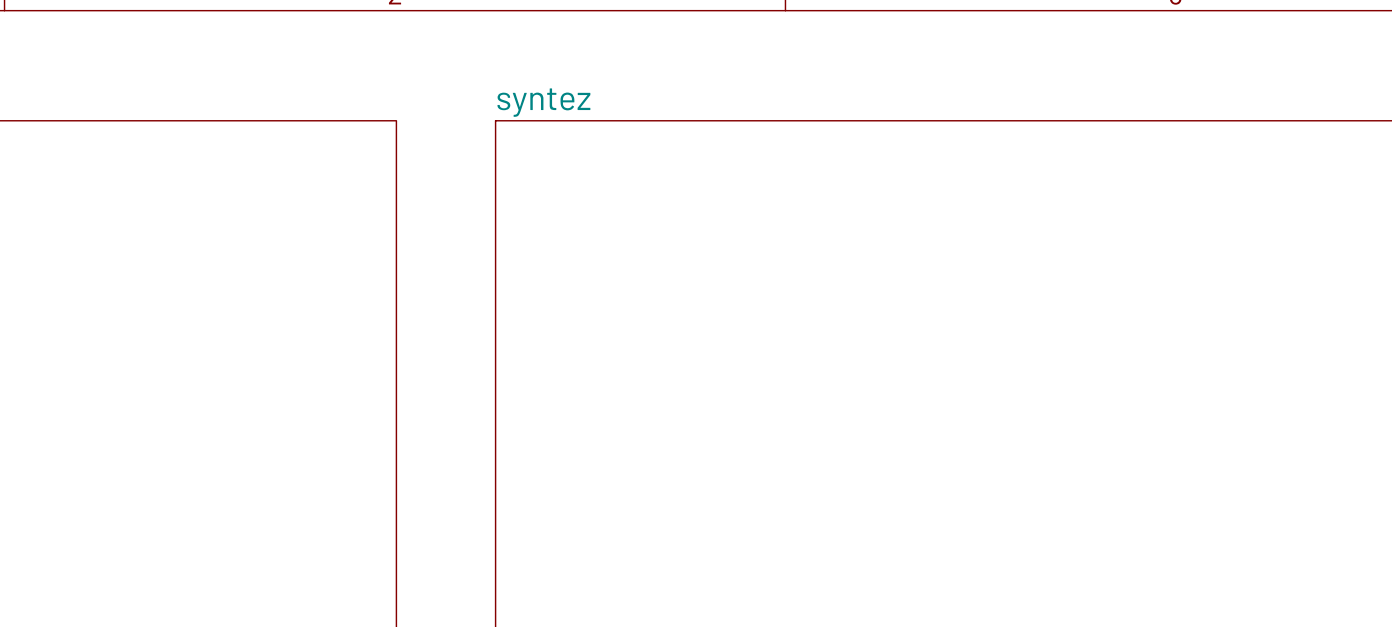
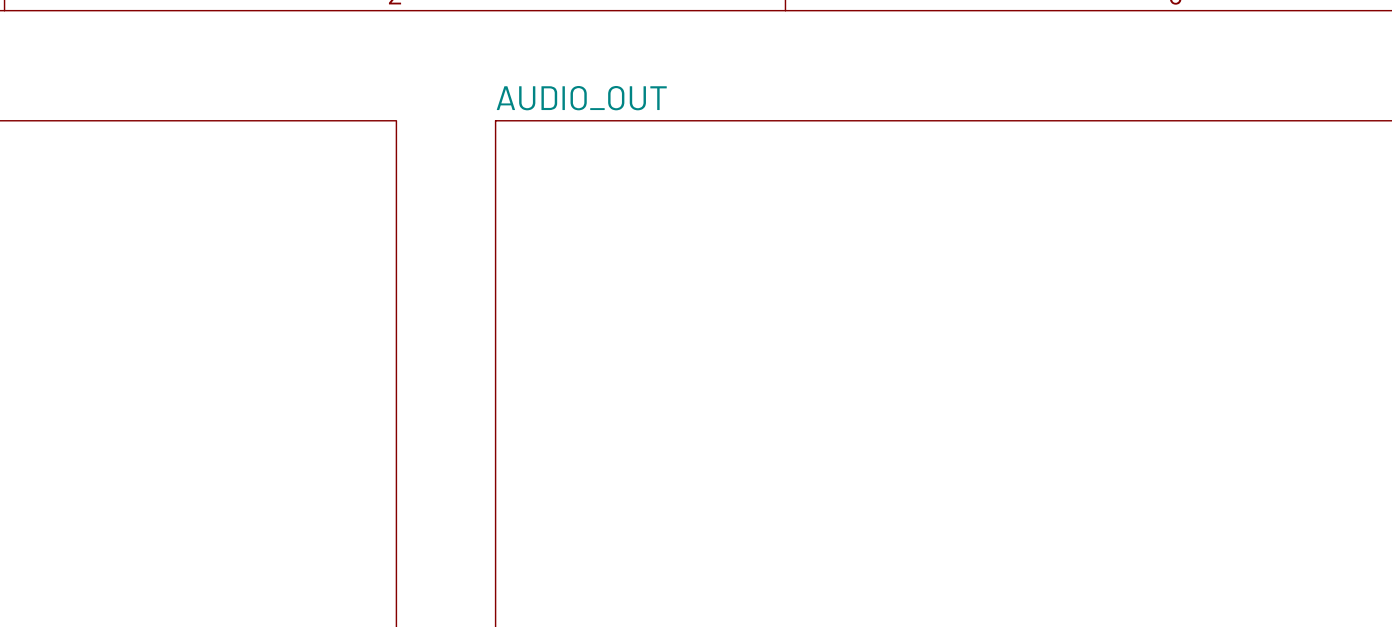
sheet syntez name: syntez (543, 102) -> AUDIO_OUT (581, 98)

